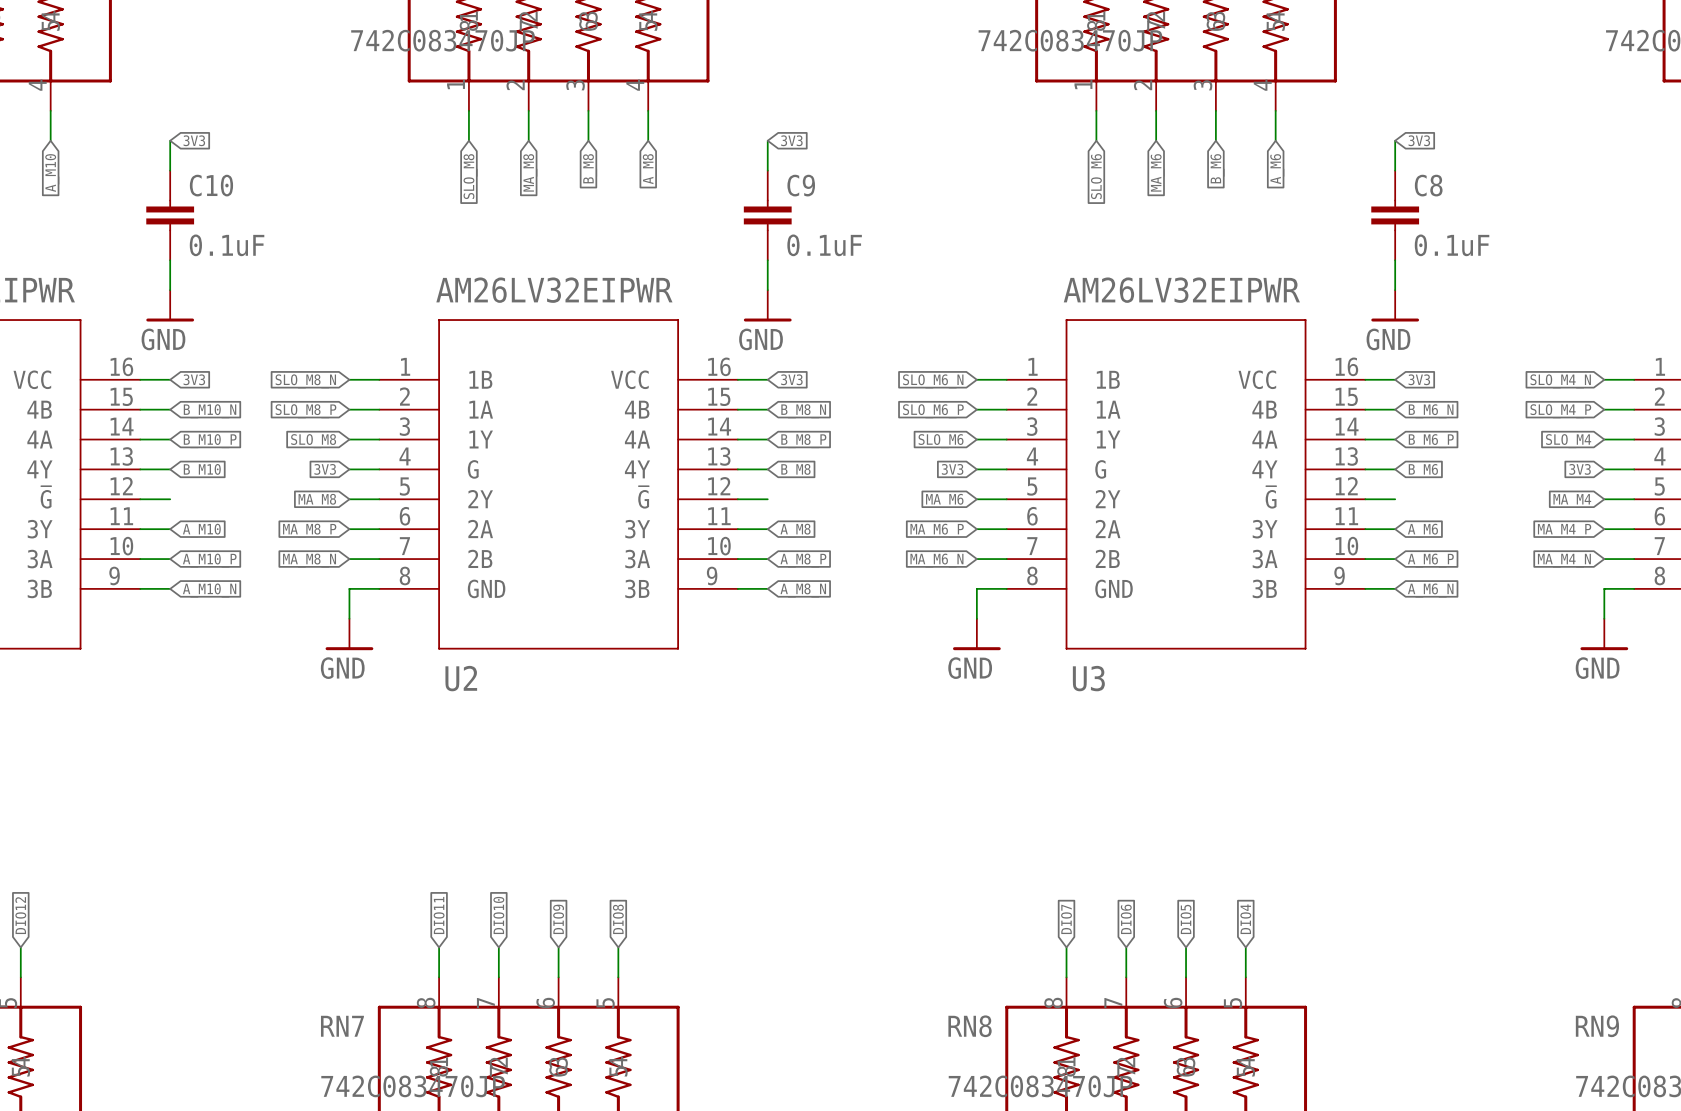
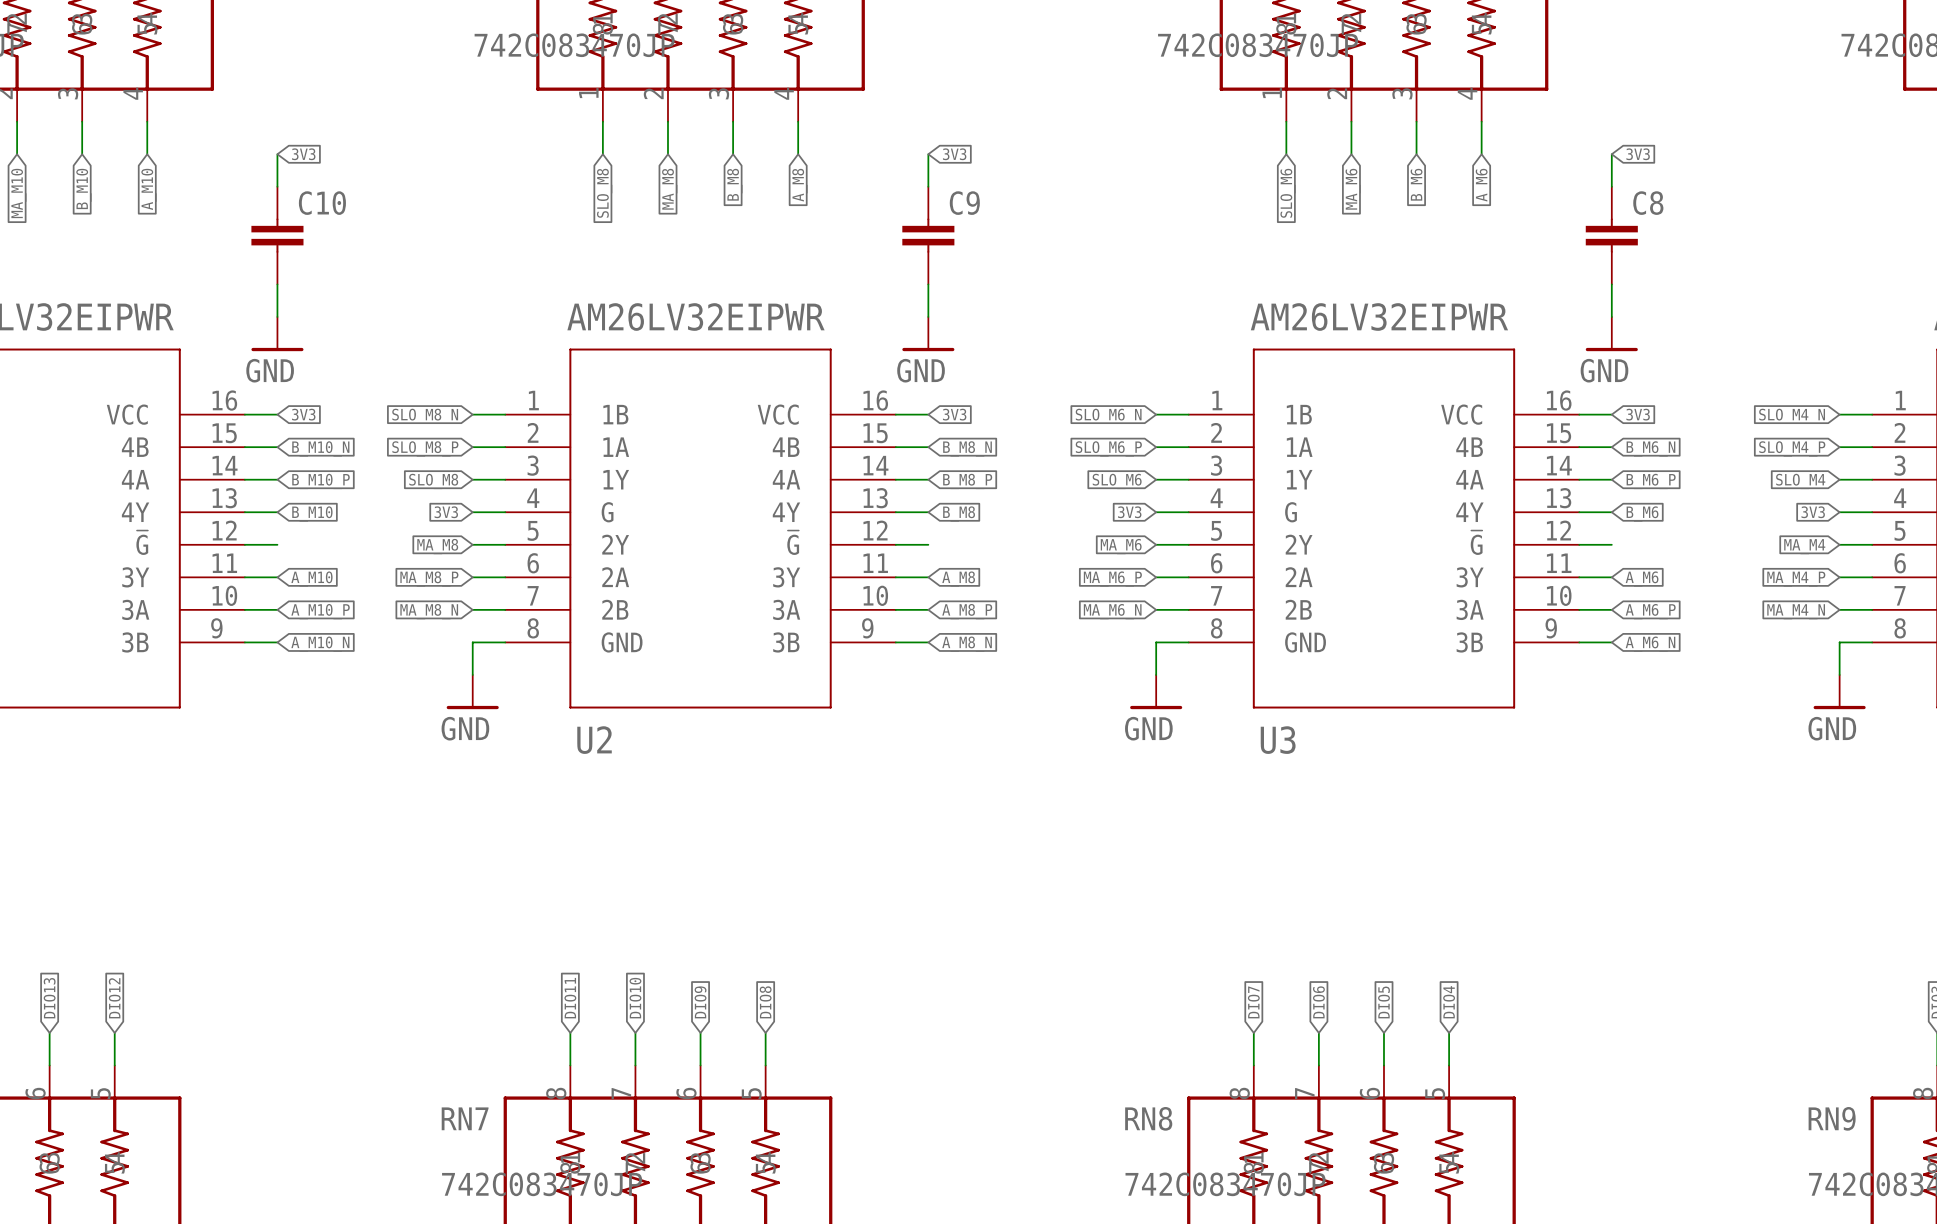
C10 value: 0.1uF (227, 245) -> none
C9 value: 0.1uF (824, 245) -> none
C8 value: 0.1uF (1452, 245) -> none

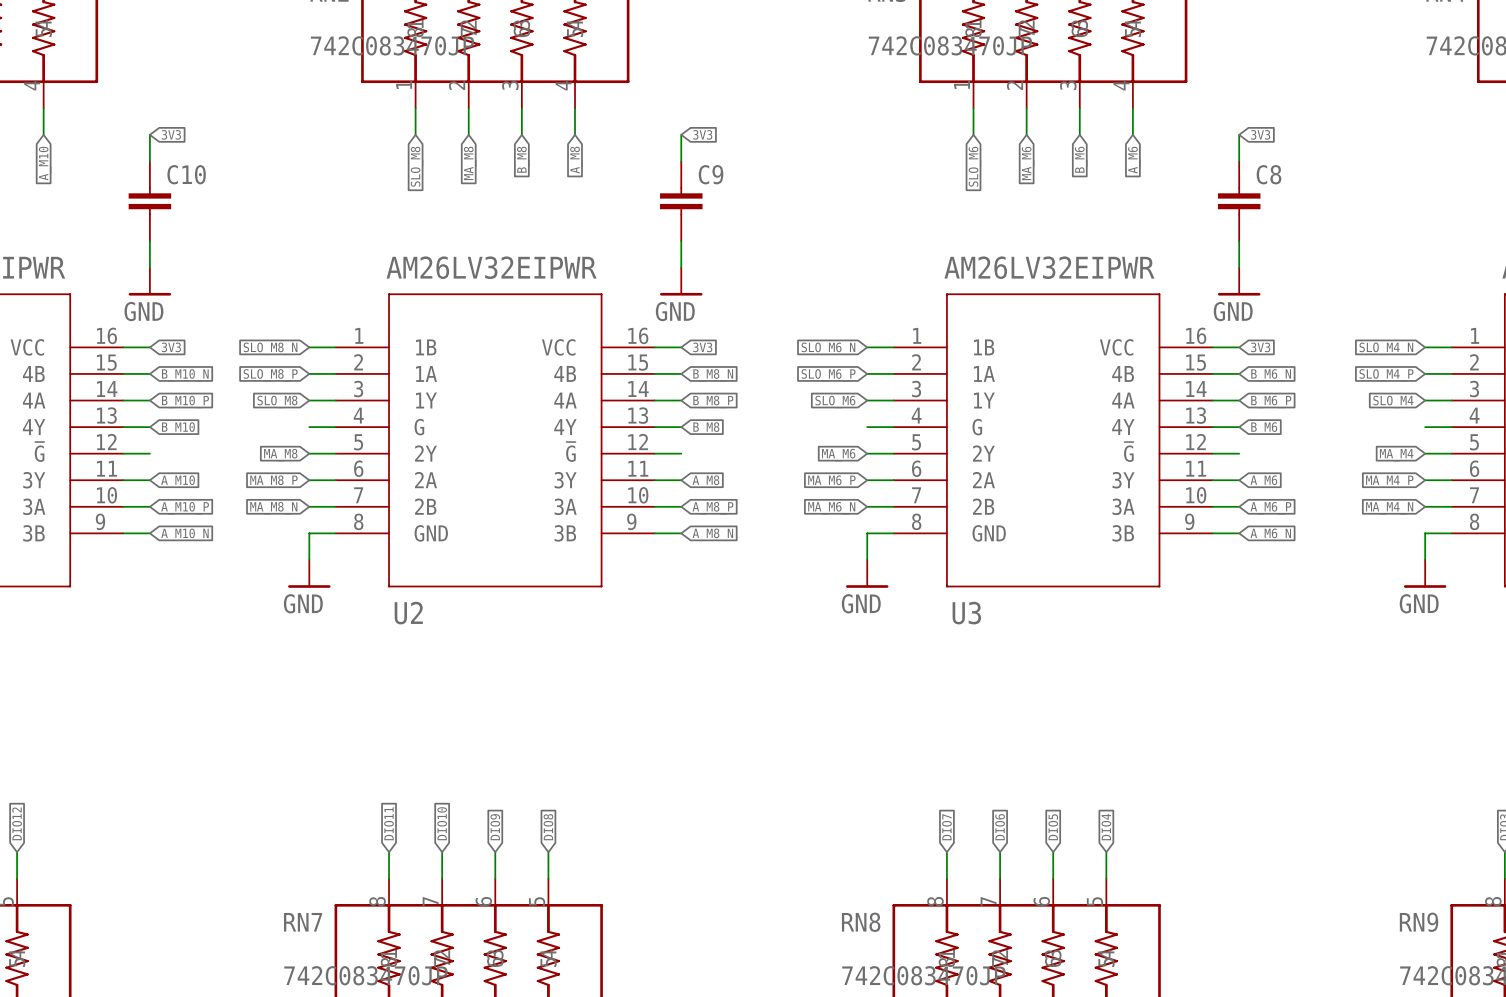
global label: 3V3 (446, 512) -> none
global label: 3V3 (1129, 512) -> none
global label: 3V3 (1813, 512) -> none

